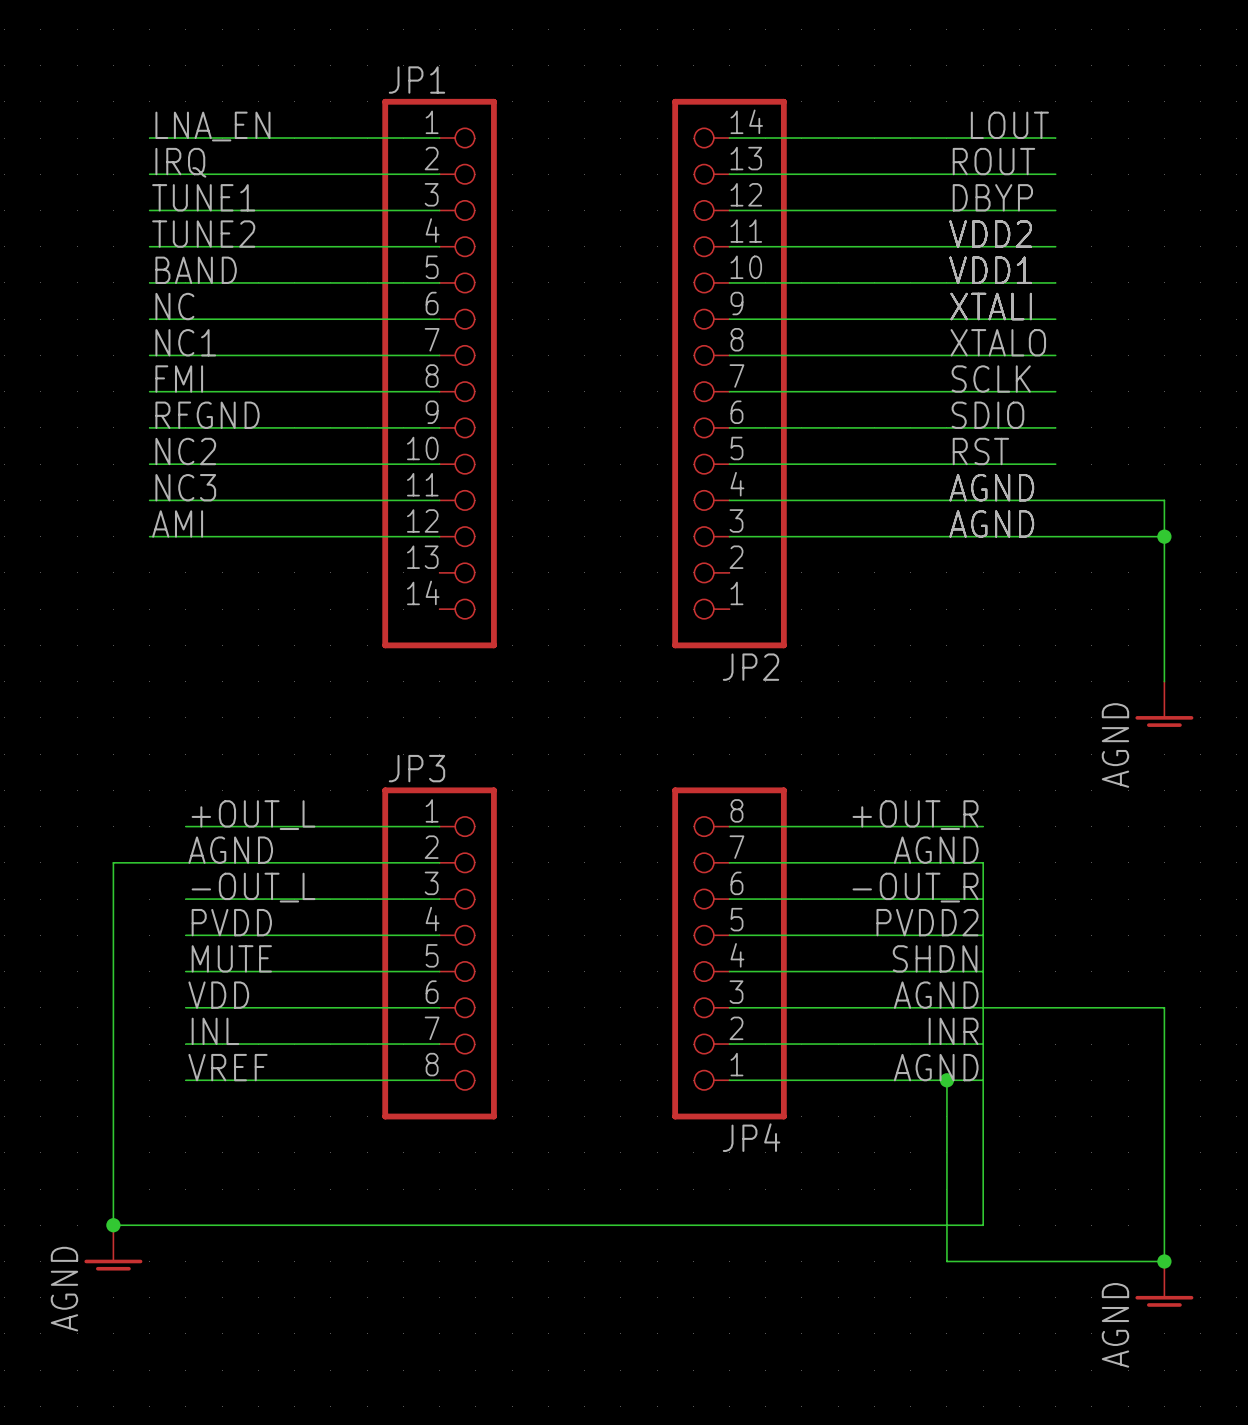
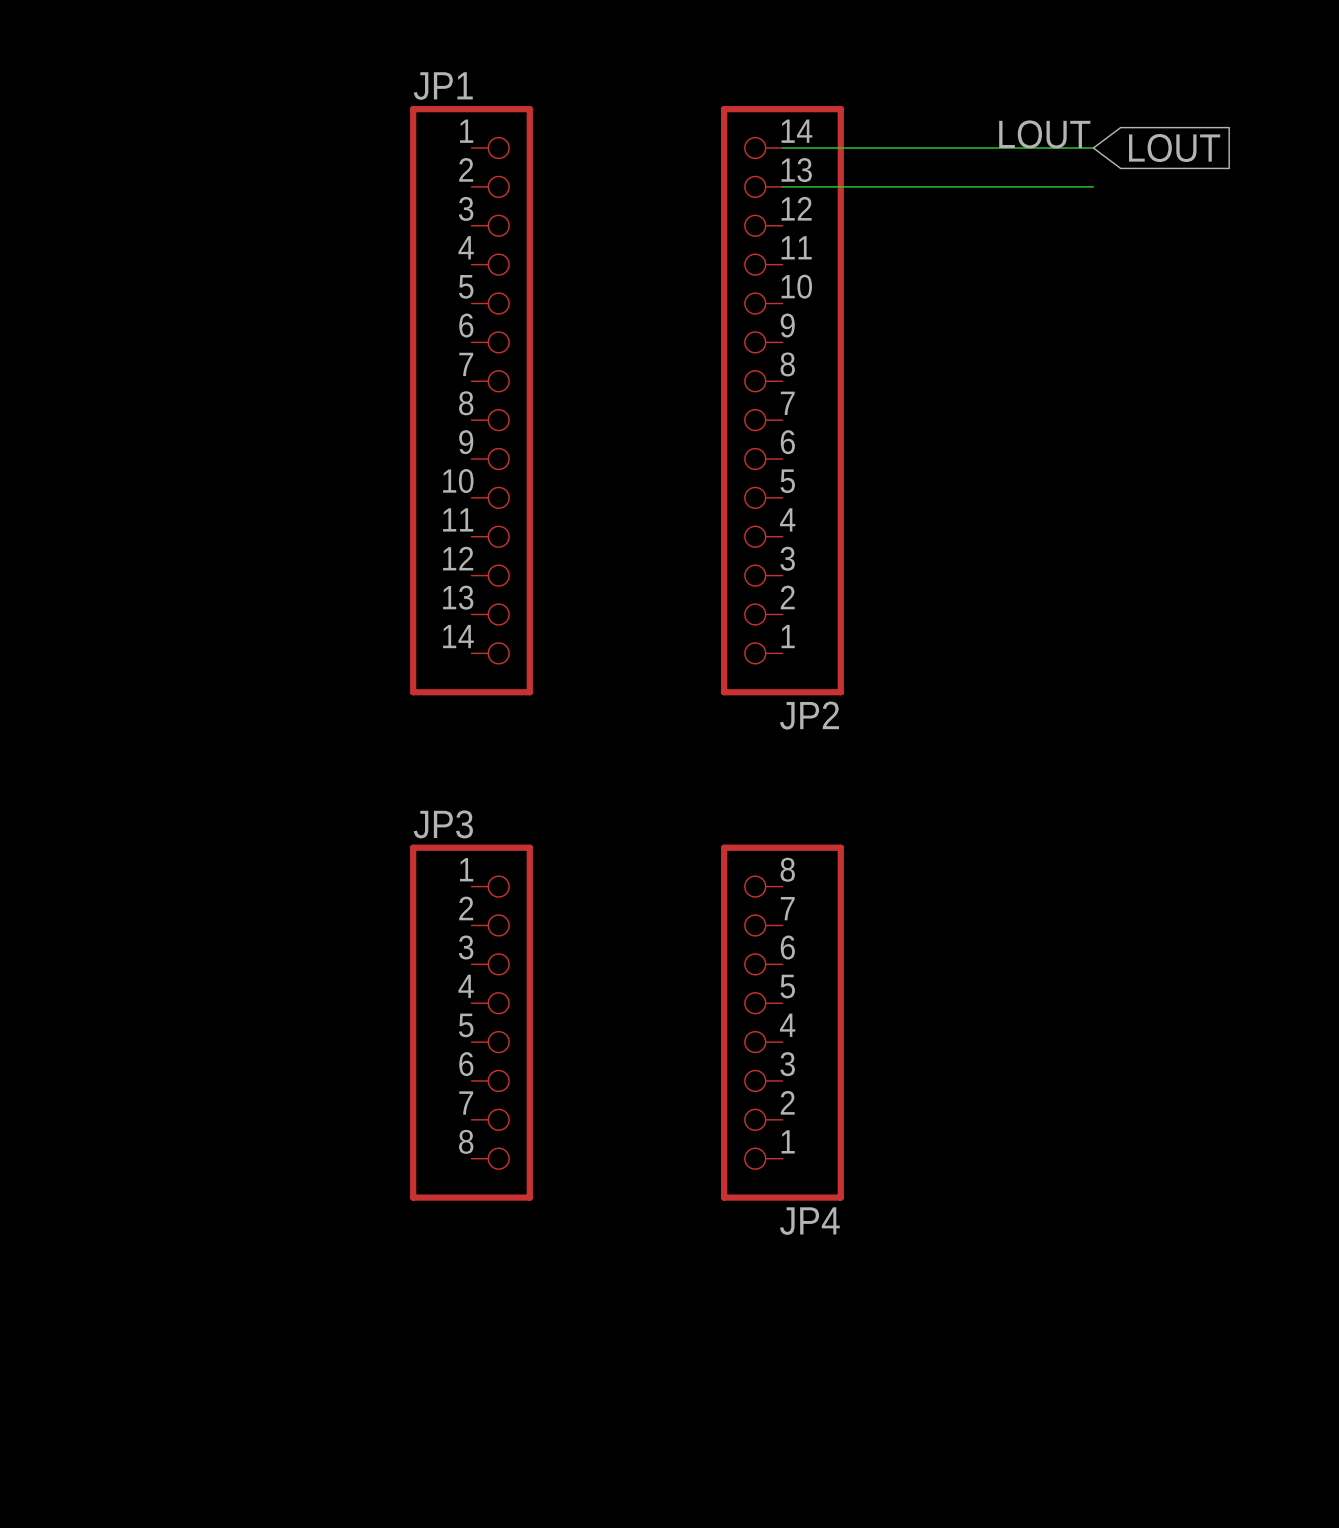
label position: LOUT (1009, 125) -> LOUT (1044, 134)
label: LNA_EN (212, 126) -> none
wire: (149, 138) (439, 138) -> none
wire: (1019, 138) (1055, 138) -> none
global label: none -> LOUT (1174, 148)
label: ROUT (993, 161) -> none
label: IRQ (180, 162) -> none
wire: (149, 174) (439, 174) -> none
wire: (1019, 174) (1055, 174) -> none
label: TUNE1 (203, 197) -> none
label: DBYP (992, 197) -> none
wire: (149, 210) (439, 210) -> none
wire: (729, 210) (1055, 210) -> none
label: TUNE2 (203, 234) -> none
label: VDD2 (990, 234) -> none
wire: (149, 246) (439, 246) -> none
wire: (729, 246) (1055, 246) -> none
label: BAND (196, 270) -> none
label: VDD1 (990, 270) -> none
wire: (149, 282) (439, 282) -> none
wire: (729, 282) (1055, 282) -> none
label: NC (174, 306) -> none
label: XTALI (991, 306) -> none
wire: (149, 319) (439, 319) -> none
wire: (729, 319) (1055, 319) -> none
label: NC1 (185, 342) -> none
label: XTALO (998, 342) -> none
wire: (149, 355) (439, 355) -> none
wire: (729, 355) (1055, 355) -> none
label: FMI (179, 379) -> none
label: SCLK (991, 379) -> none
wire: (149, 391) (439, 391) -> none
wire: (729, 391) (1055, 391) -> none
label: RFGND (207, 415) -> none
label: SDIO (987, 415) -> none
wire: (149, 427) (439, 427) -> none
wire: (729, 427) (1055, 427) -> none
label: NC2 (185, 451) -> none
label: RST (980, 451) -> none
wire: (149, 464) (439, 464) -> none
wire: (729, 464) (1055, 464) -> none
label: NC3 (185, 487) -> none
label: AGND (991, 487) -> none
wire: (149, 500) (439, 500) -> none
wire: (729, 500) (1164, 500) (1164, 681) -> none
label: AMI (177, 523) -> none
label: AGND (991, 523) -> none
wire: (149, 536) (439, 536) -> none
wire: (729, 536) (1164, 536) -> none
junction: (1164, 536) -> none
power symbol: AGND (1164, 704) -> none
label: +OUT_L (253, 815) -> none
label: +OUT_R (915, 815) -> none
wire: (185, 826) (439, 826) -> none
wire: (729, 826) (983, 826) -> none
label: AGND (230, 850) -> none
label: AGND (936, 850) -> none
wire: (439, 862) (113, 862) (113, 1225) (983, 1225) (983, 862) (729, 862) -> none
label: -OUT_L (253, 887) -> none
label: -OUT_R (915, 887) -> none
wire: (185, 899) (439, 899) -> none
wire: (729, 899) (983, 899) -> none
label: PVDD (231, 922) -> none
label: PVDD2 (927, 922) -> none
wire: (185, 935) (439, 935) -> none
wire: (729, 935) (983, 935) -> none
label: MUTE (231, 958) -> none
label: SHDN (935, 958) -> none
wire: (185, 971) (439, 971) -> none
wire: (729, 971) (983, 971) -> none
label: VDD (218, 995) -> none
label: AGND (936, 995) -> none
wire: (185, 1007) (439, 1007) -> none
wire: (729, 1007) (1164, 1007) (1164, 1261) (946, 1261) (946, 1080) -> none
label: INL (215, 1031) -> none
label: INR (953, 1031) -> none
wire: (185, 1044) (439, 1044) -> none
wire: (729, 1044) (983, 1044) -> none
label: VREF (227, 1067) -> none
label: AGND (936, 1067) -> none
wire: (185, 1080) (439, 1080) -> none
wire: (729, 1080) (983, 1080) -> none
junction: (946, 1080) -> none
junction: (113, 1225) -> none
power symbol: AGND (113, 1247) -> none
junction: (1164, 1261) -> none
power symbol: AGND (1164, 1284) -> none

